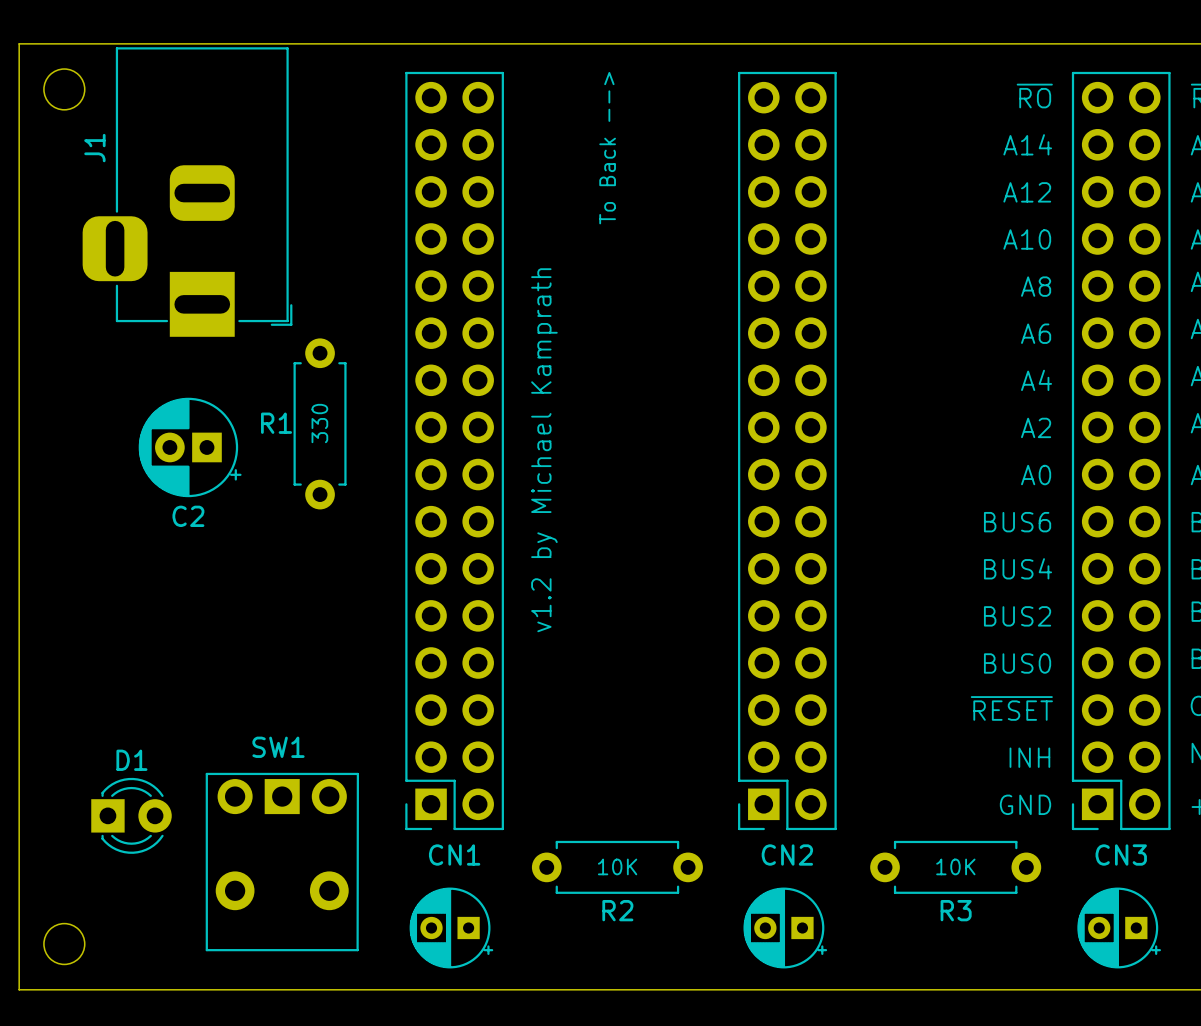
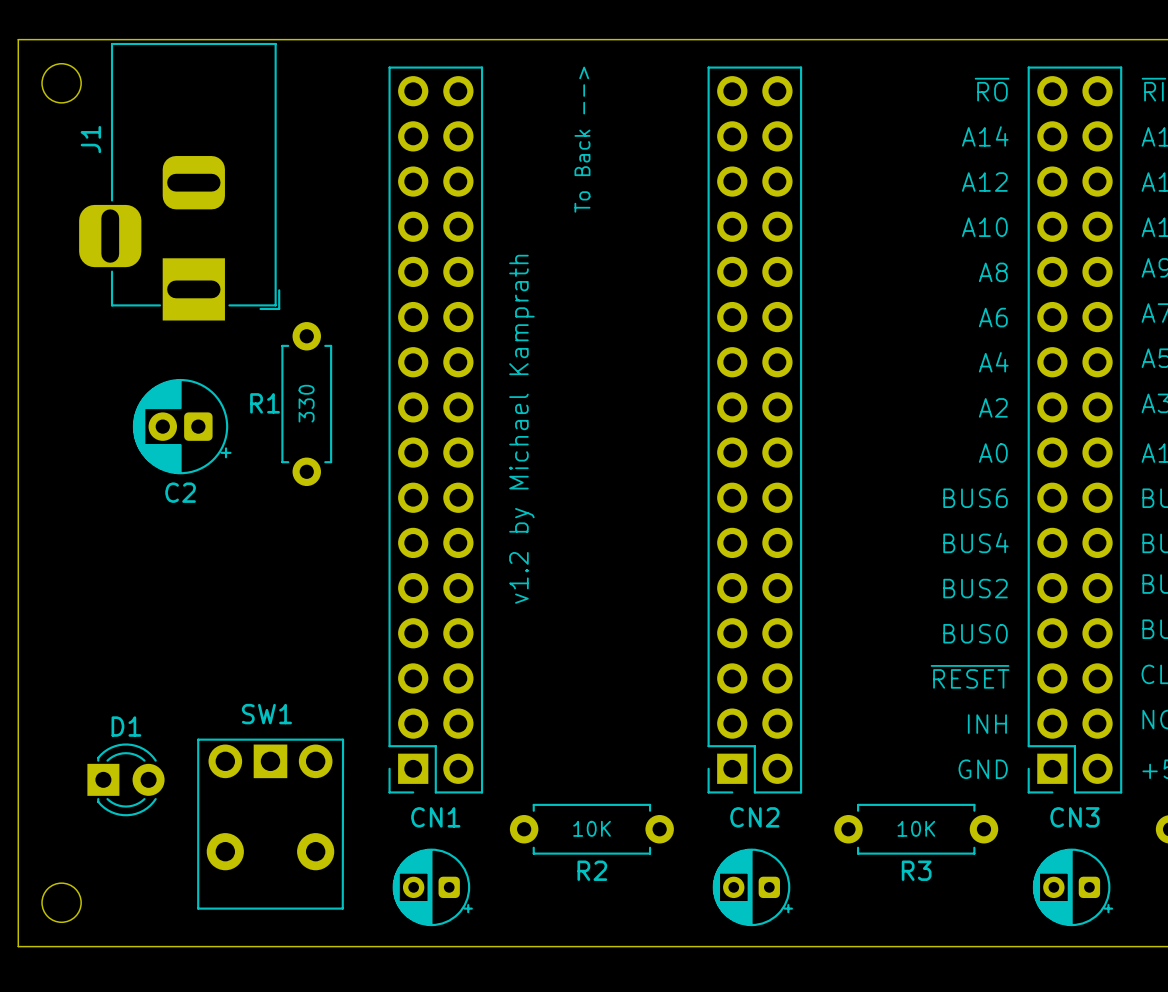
C2 footprint: [138, 397, 242, 498] -> [132, 378, 232, 475]
part footprint: [409, 887, 494, 969] -> [392, 848, 473, 927]
part footprint: [743, 887, 828, 969] -> [712, 848, 793, 927]
part footprint: [1077, 887, 1161, 969] -> [1032, 848, 1114, 927]

